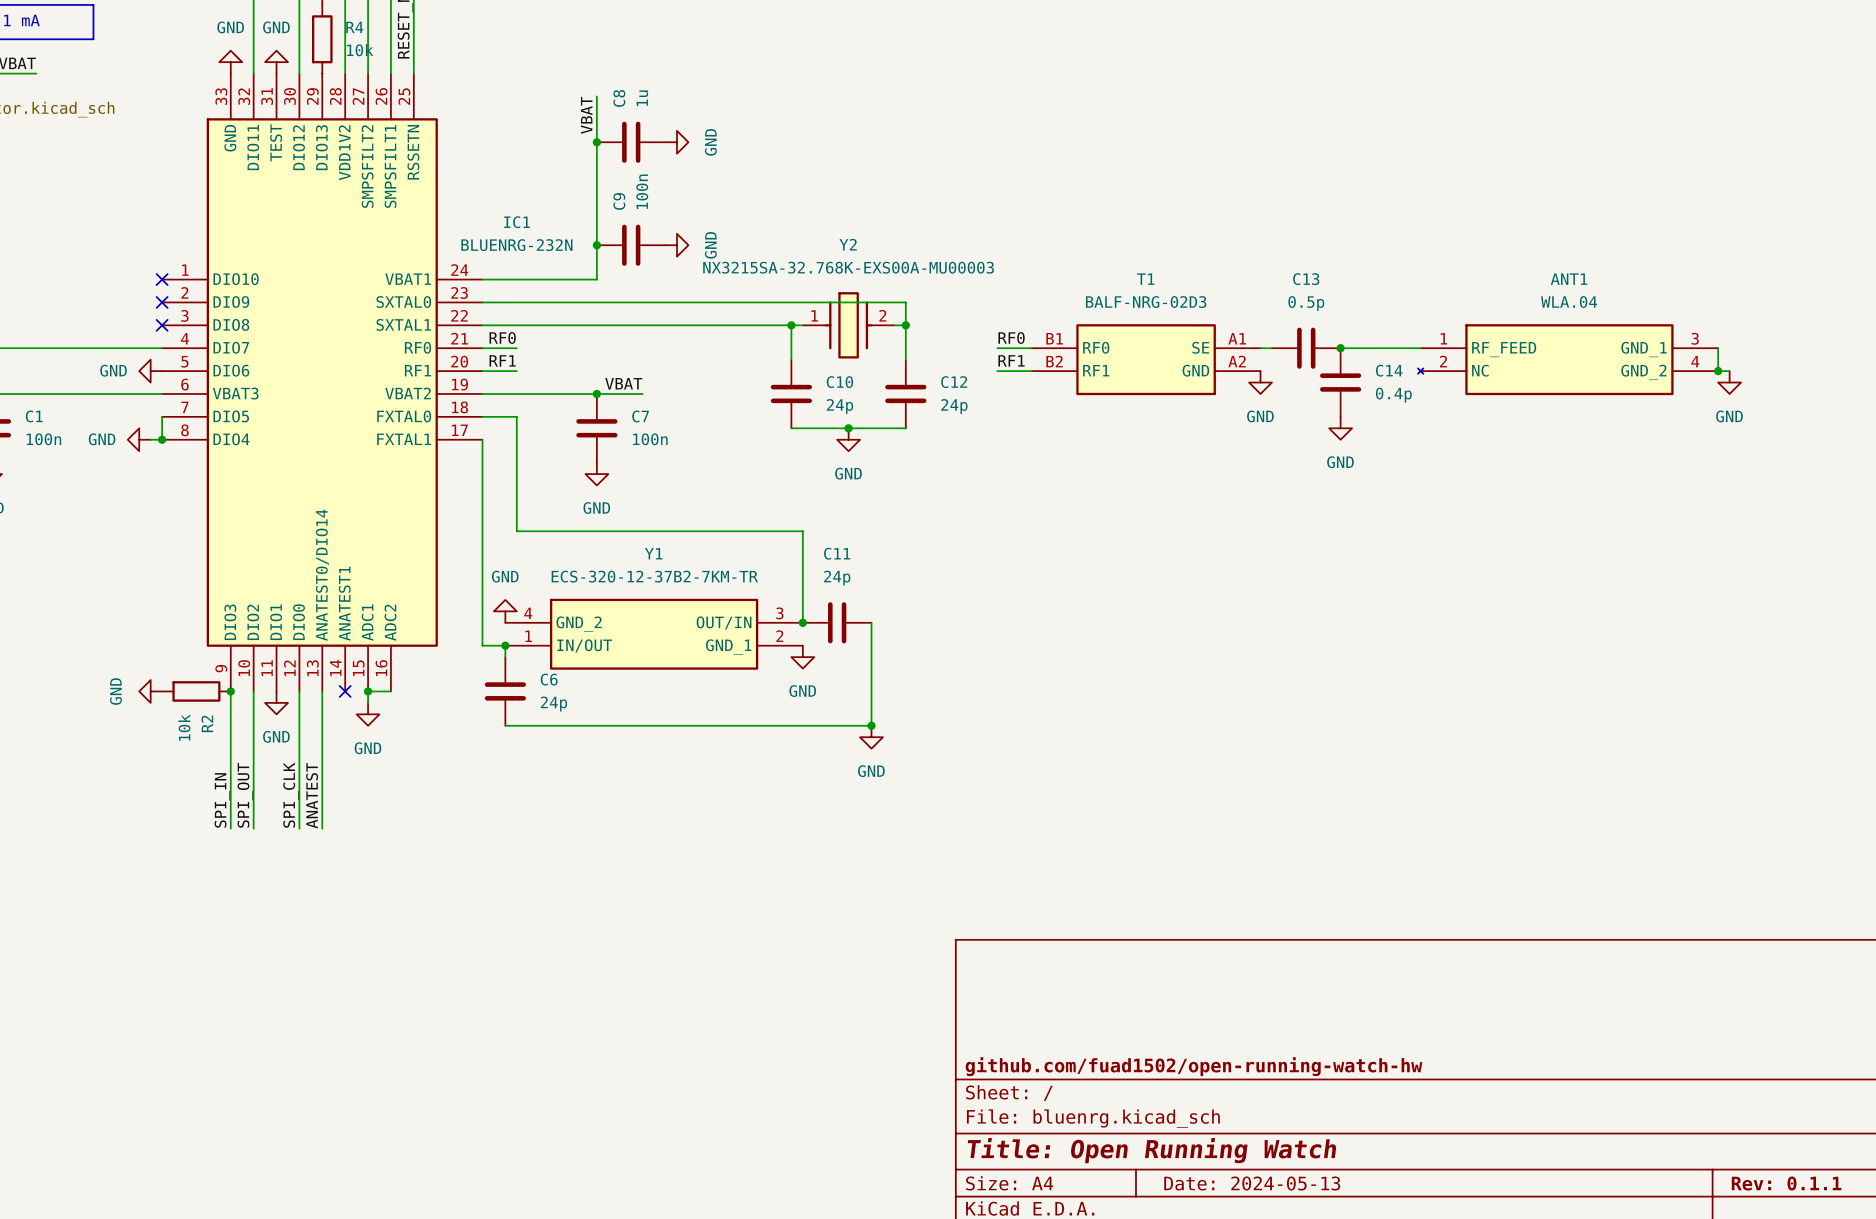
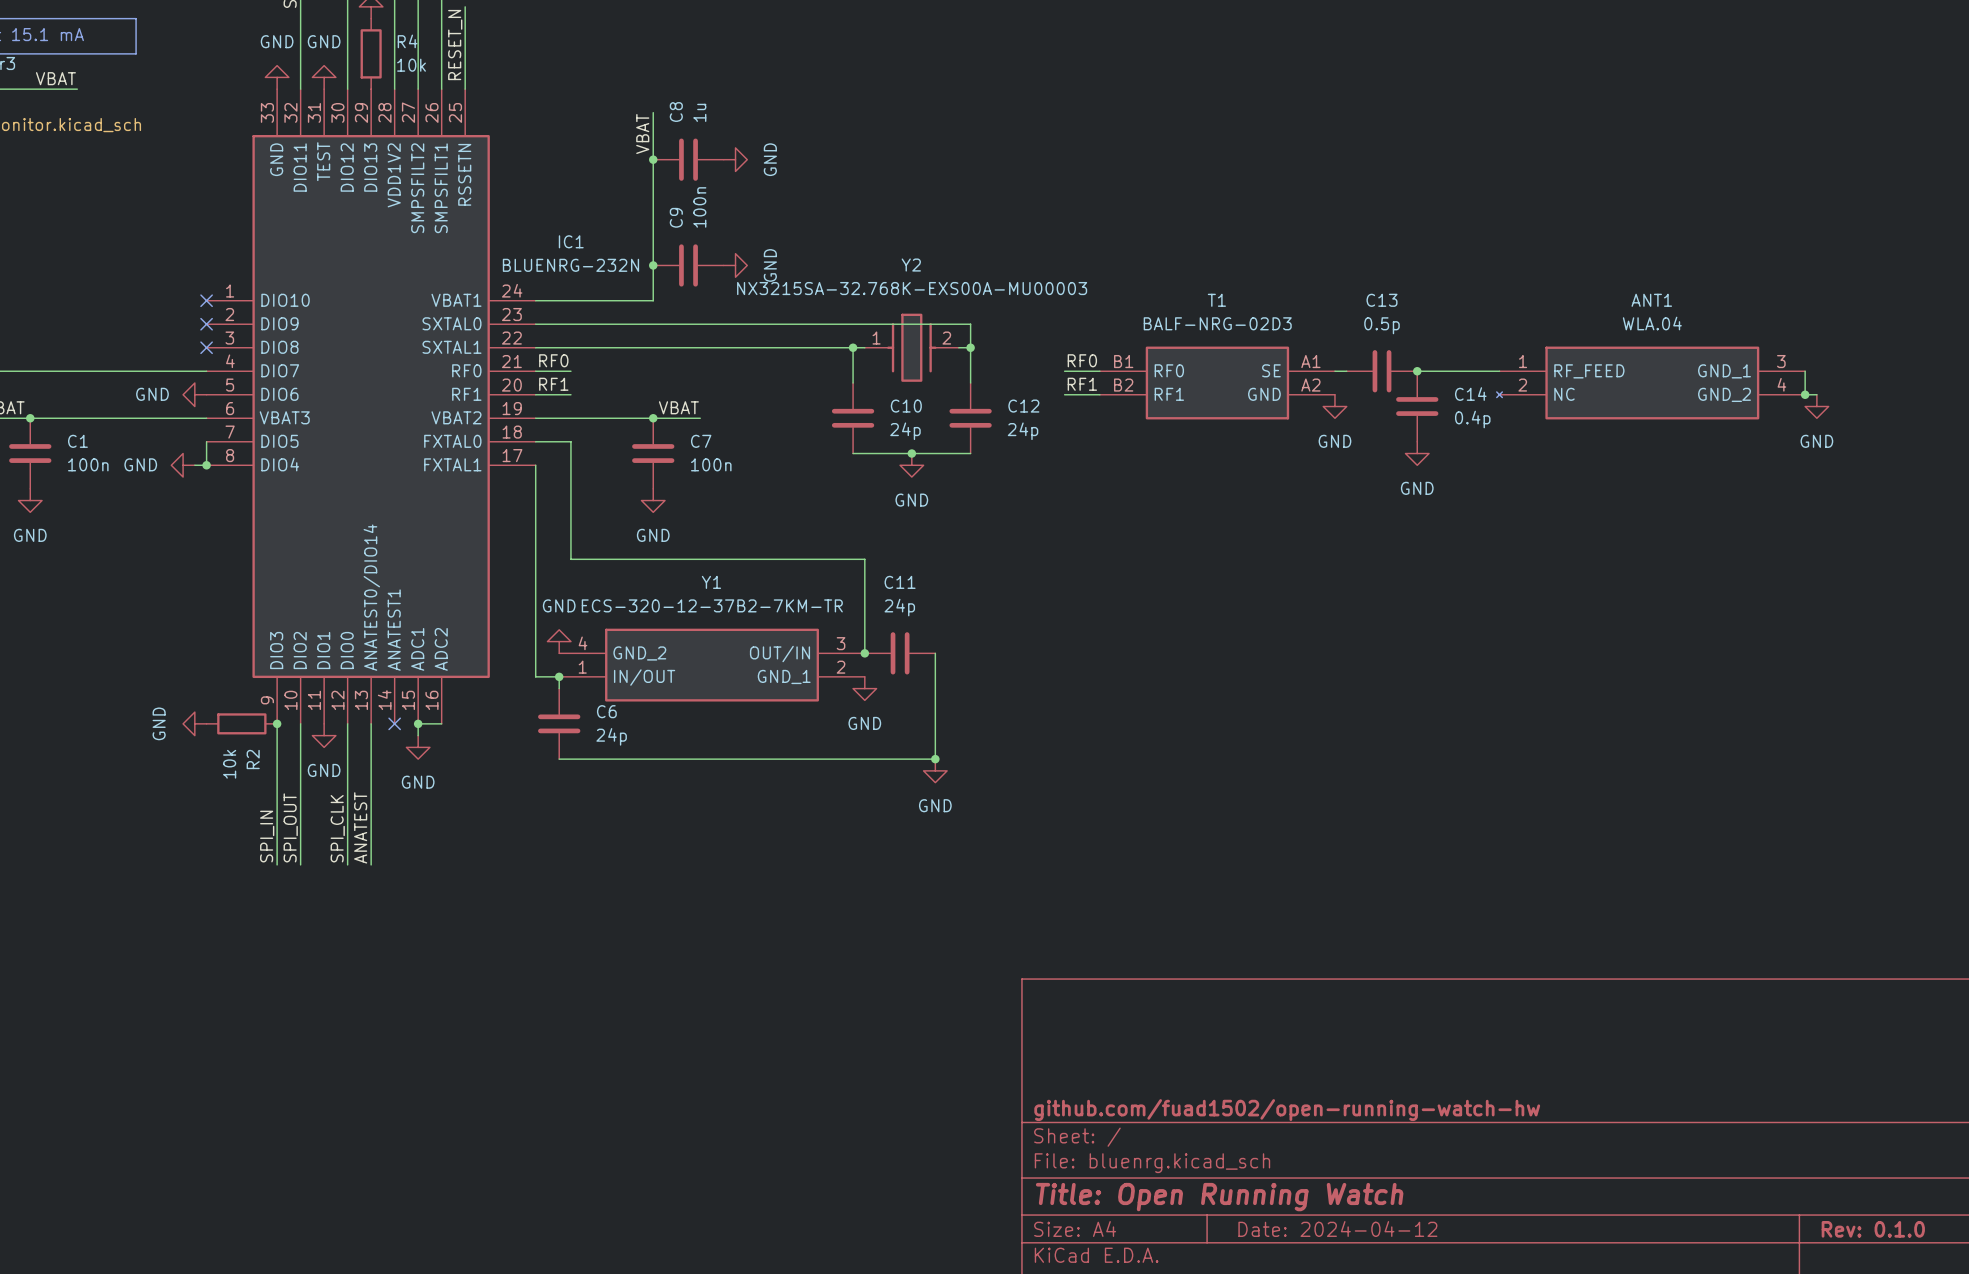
title block: Date: 2024-05-13 (1252, 1183) -> Date: 2024-04-12 (1337, 1229)
title block: Rev: 0.1.1 (1786, 1183) -> Rev: 0.1.0 (1873, 1229)

